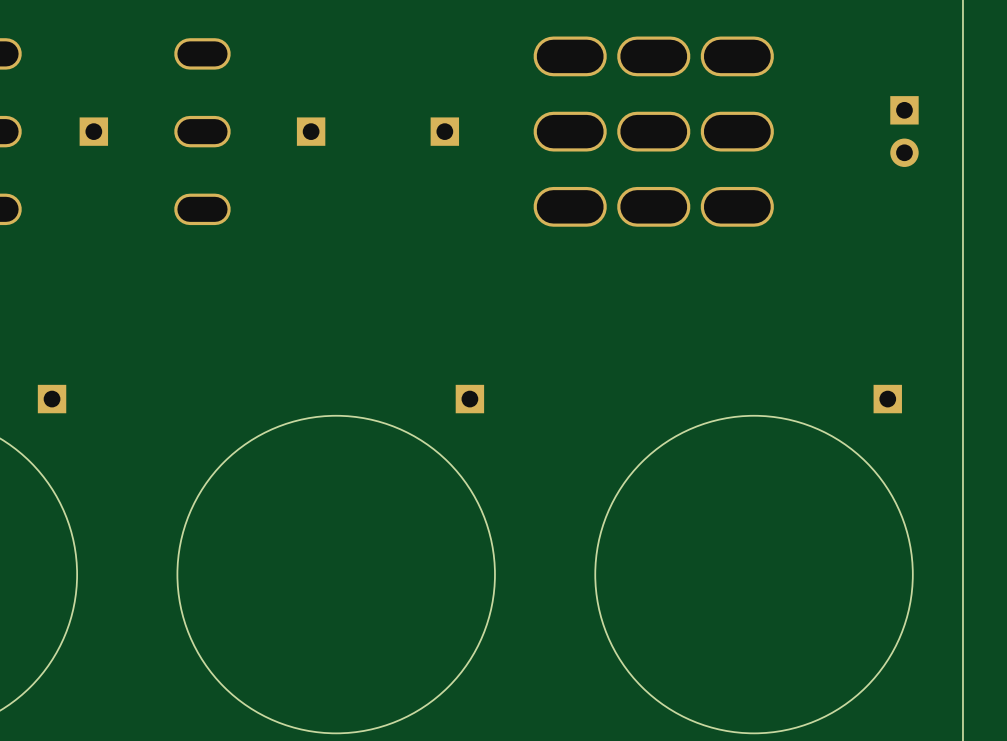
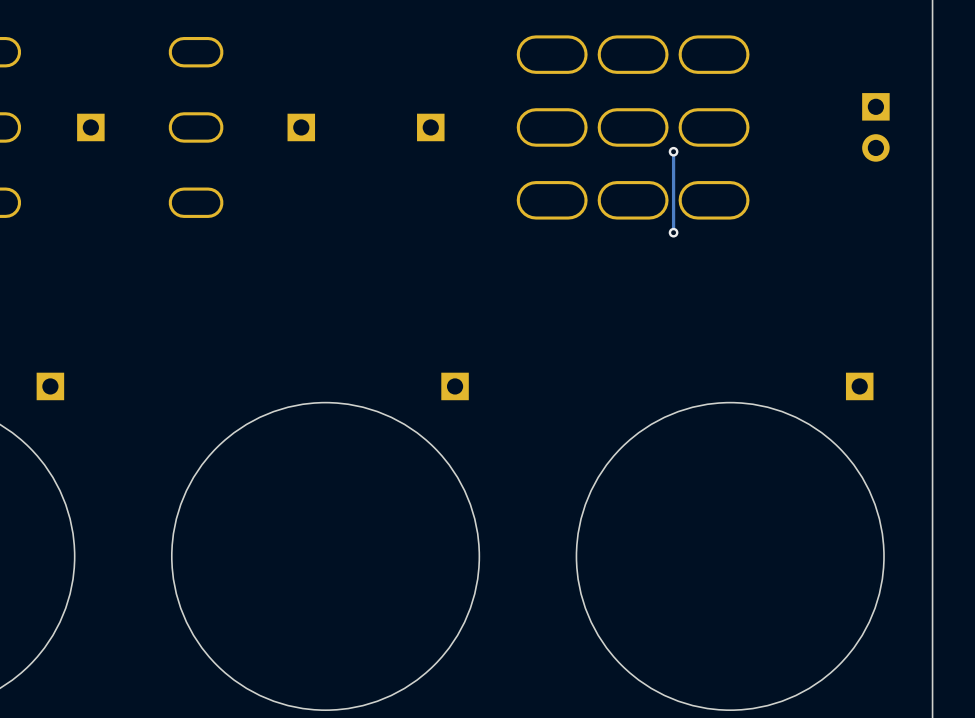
track: none -> (673, 151) (673, 232)
via: none -> (673, 151)
via: none -> (673, 232)

